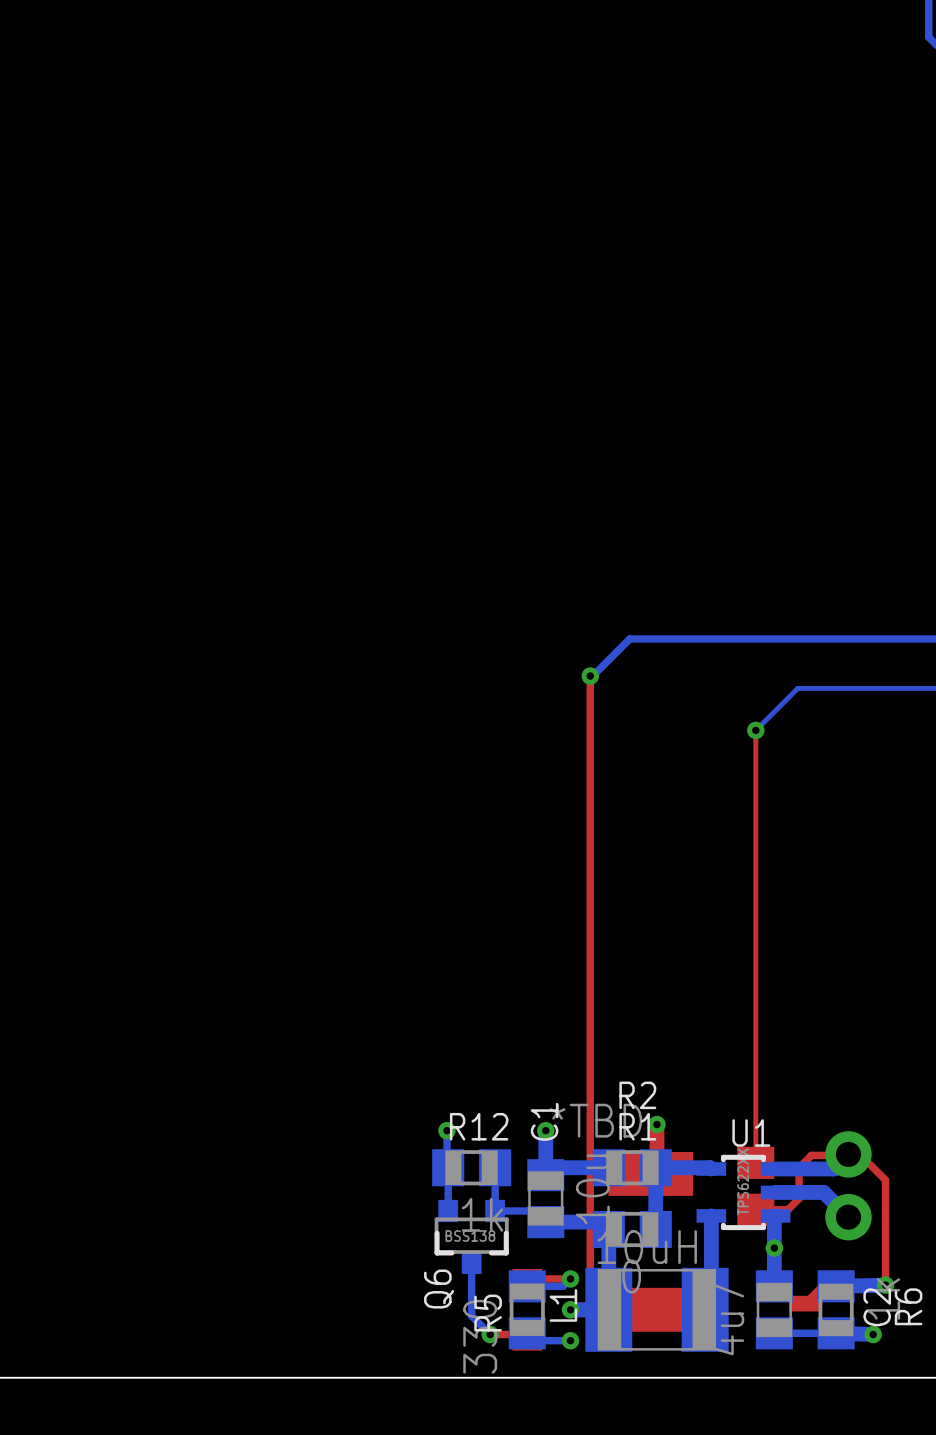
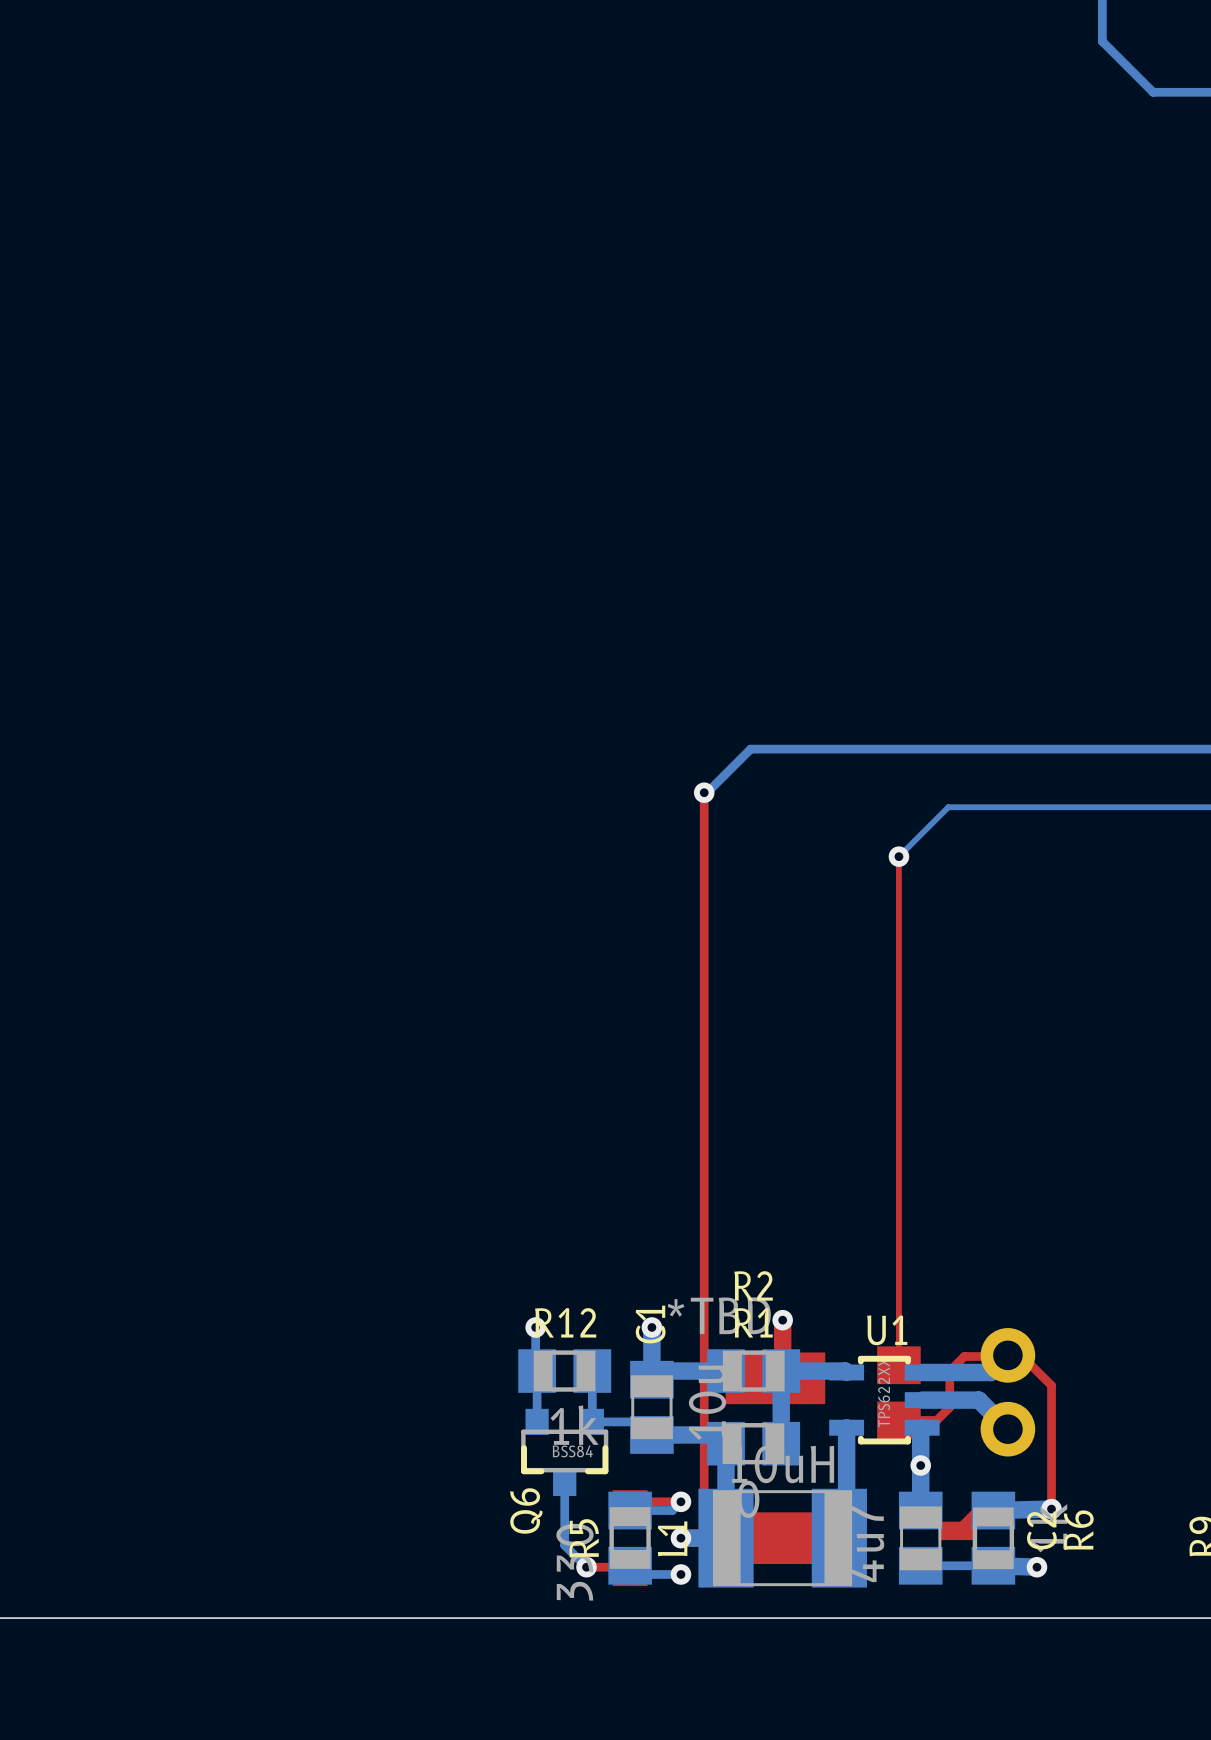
Q6 value: BSS138 (470, 1236) -> BSS84 (572, 1451)

